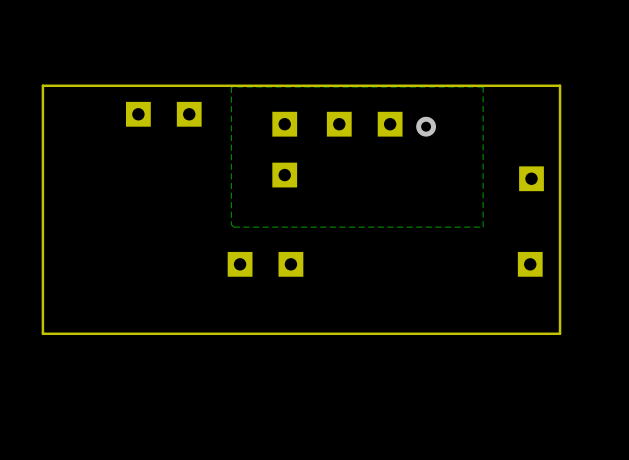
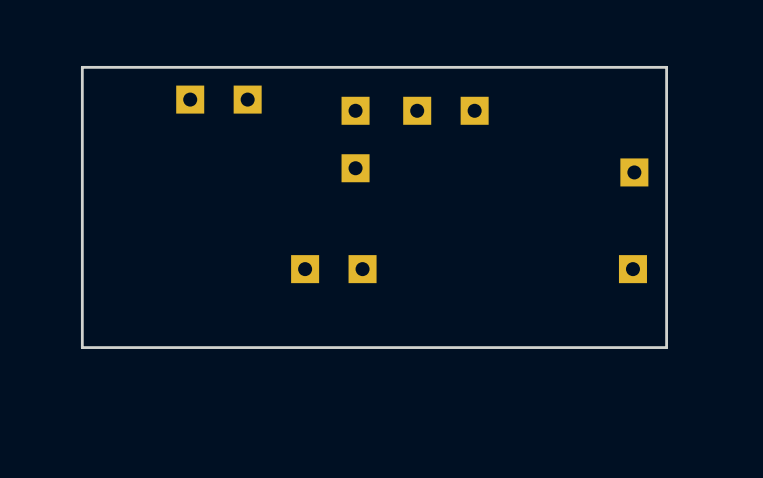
zone outline: (483, 87) (231, 87) (231, 224) (233, 227) (483, 227) (483, 87) -> none
via: (426, 126) -> none

